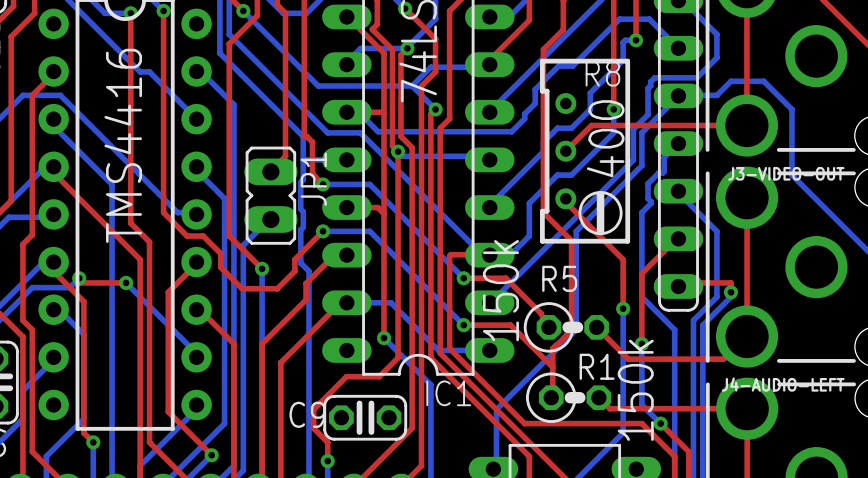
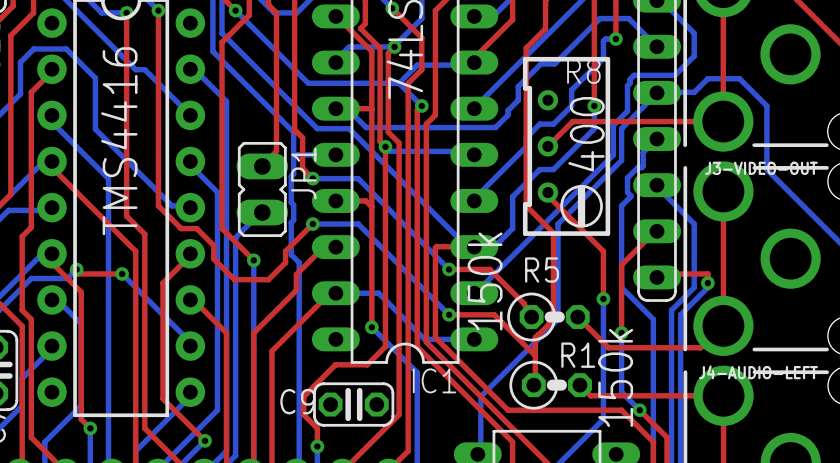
bottom track: (21, 97) (22, 95) (60, 95) (98, 133) -> (20, 94) (20, 62) (33, 48) (66, 48) (95, 78) (95, 129)

